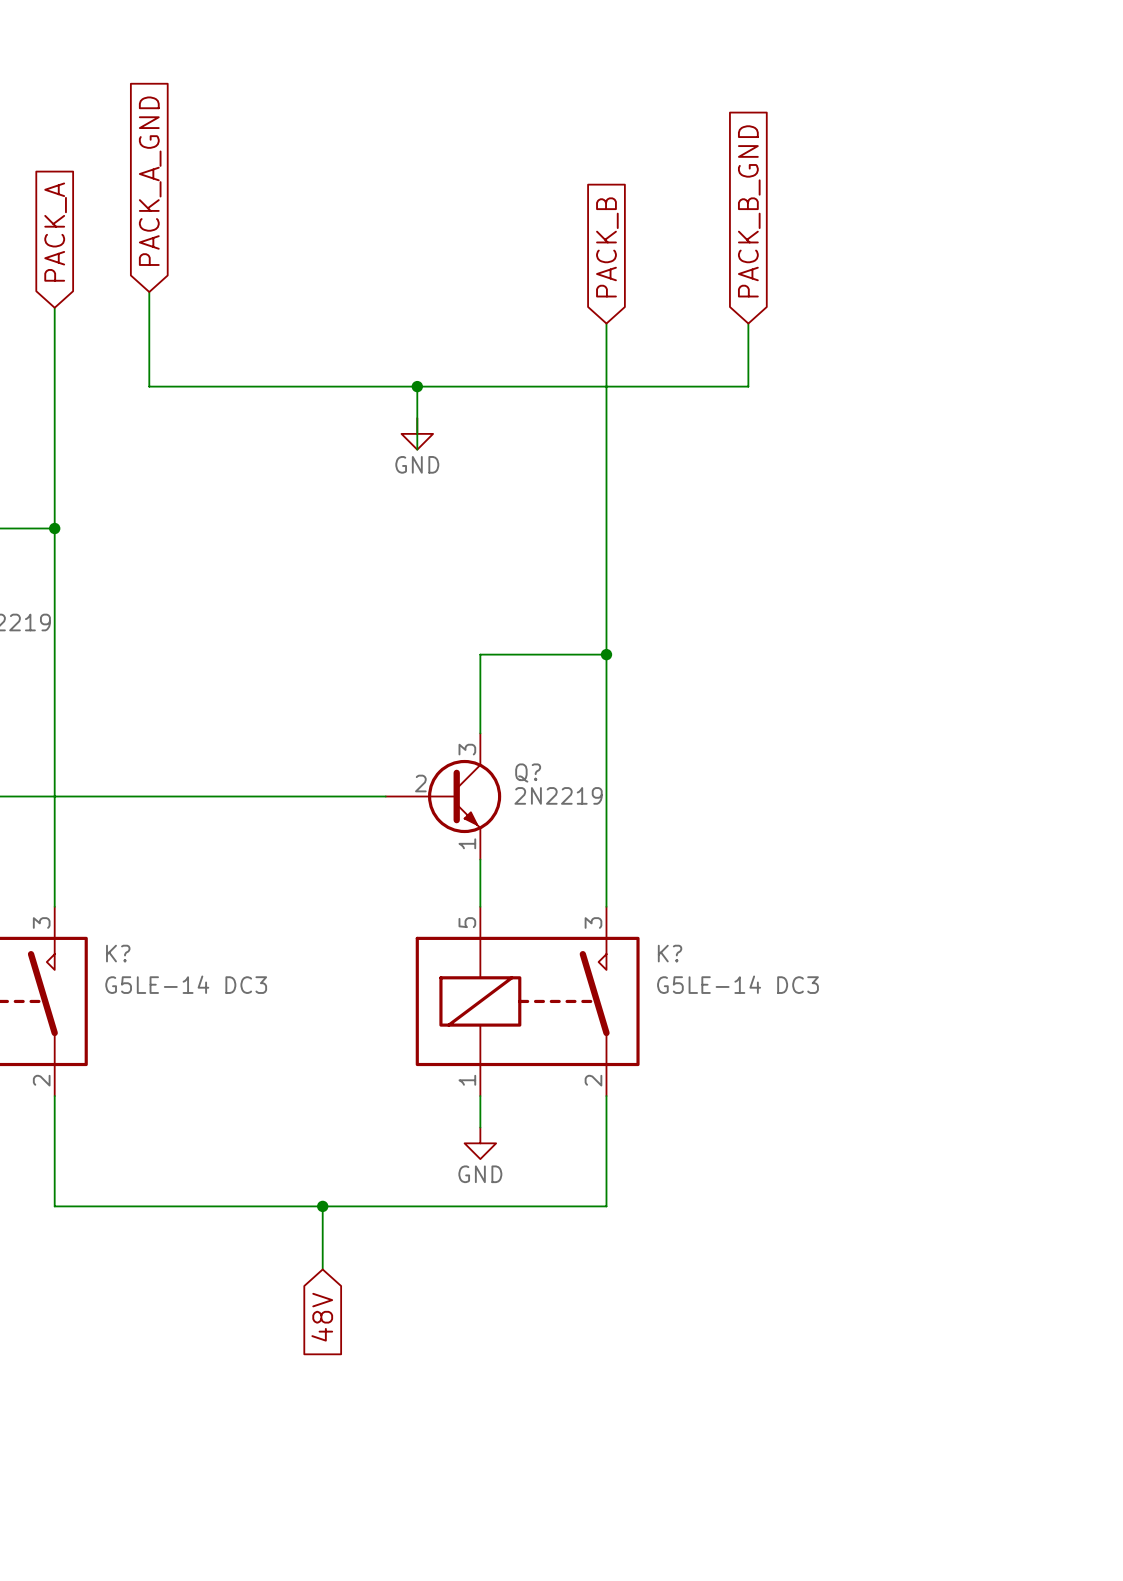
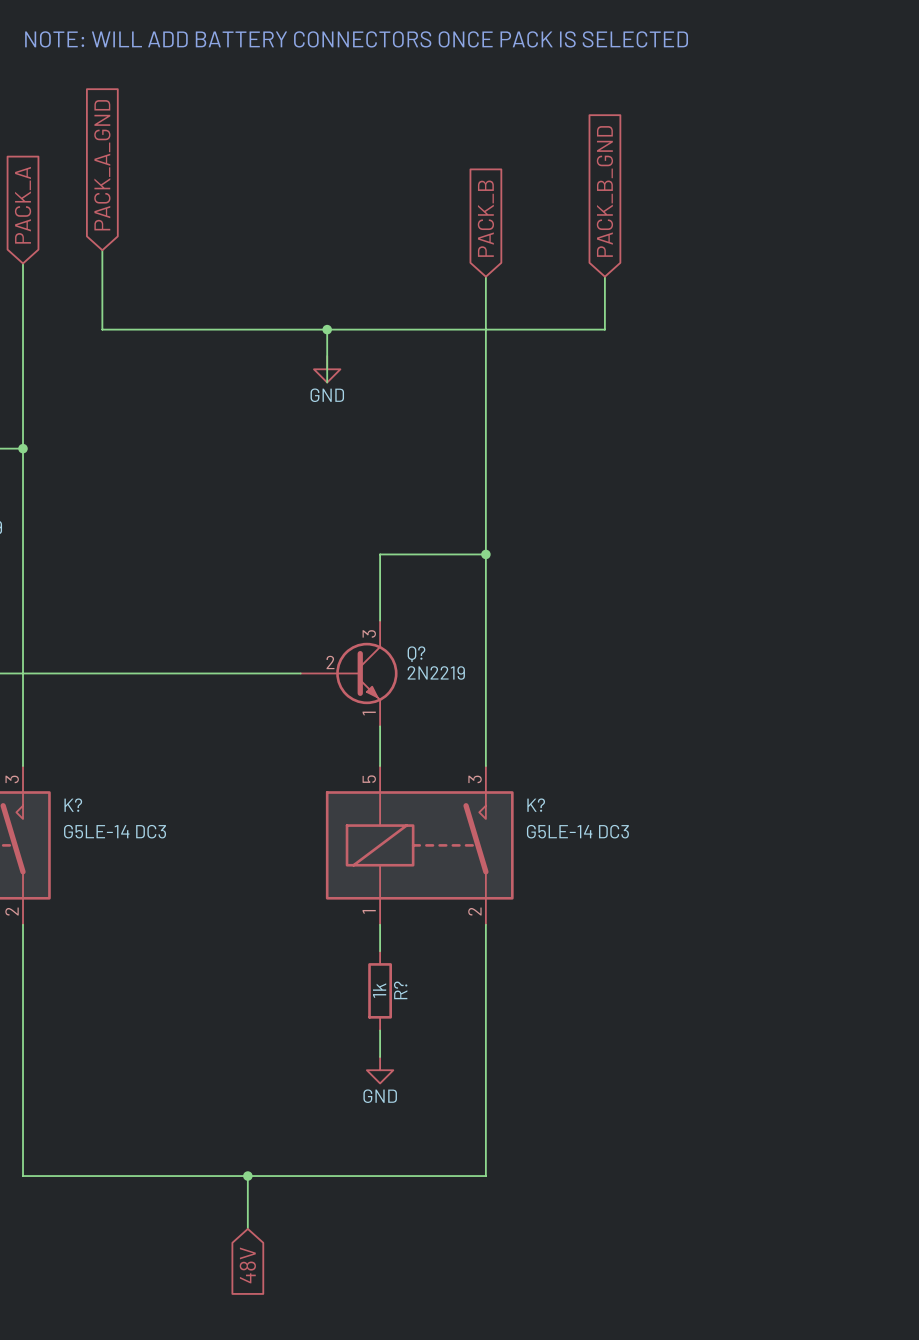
text: none -> NOTE: WILL ADD BATTERY CONNECTORS ONCE PACK IS SELECTED (356, 39)
power symbol position: GND (480, 1143) -> GND (380, 1070)
R?: none -> 1k (380, 990)
wire: (54, 1206) (606, 1206) -> (23, 1017) (23, 1176) (485, 1176) (485, 1017)
wire: (322, 1206) (322, 1269) -> (247, 1176) (247, 1228)
junction: (322, 1206) -> none
wire: none -> (380, 1030) (380, 1057)
global label position: 48V (322, 1317) -> 48V (247, 1265)
junction: none -> (247, 1176)

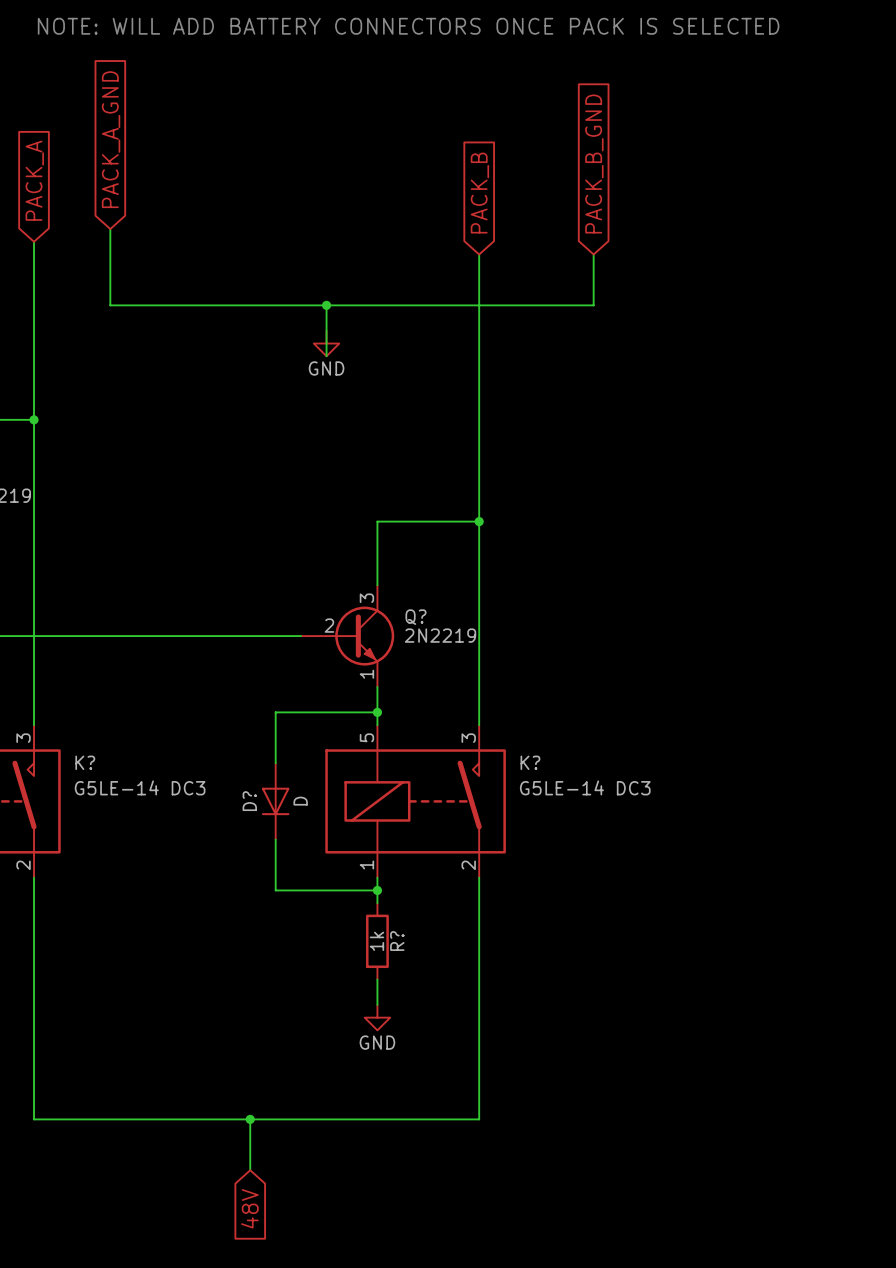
wire: none -> (377, 712) (275, 712) (275, 763)
junction: none -> (377, 712)
D?: none -> D (275, 801)
wire: none -> (275, 839) (275, 890) (377, 890)
junction: none -> (377, 890)

